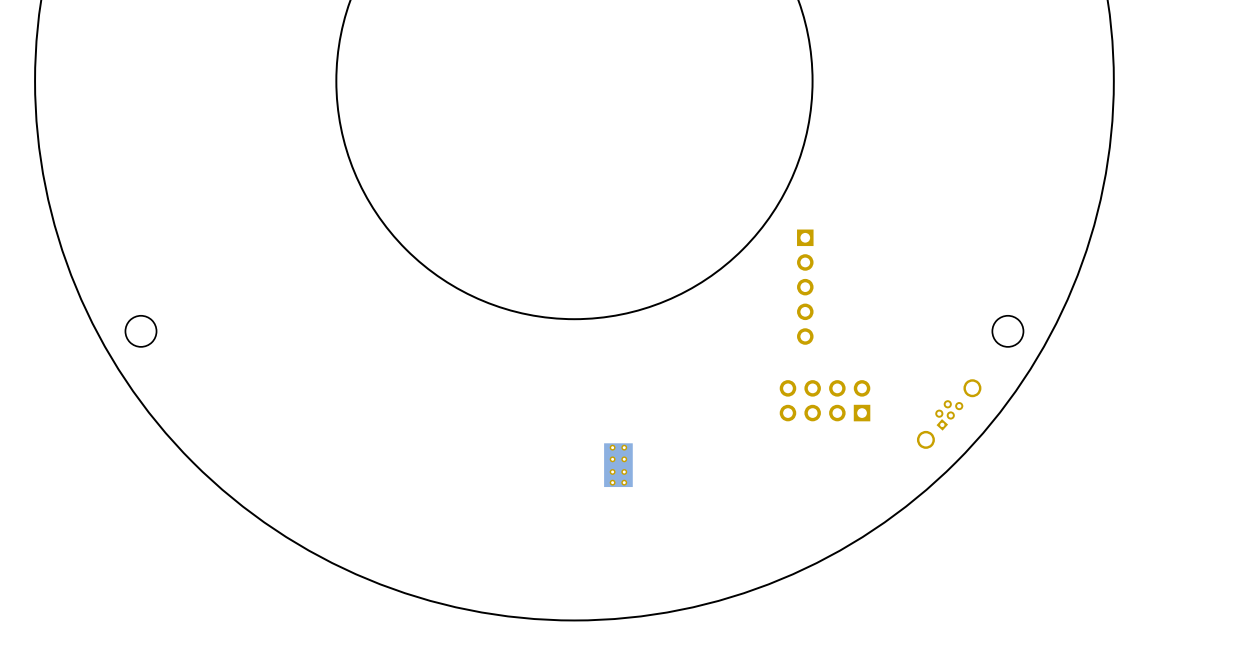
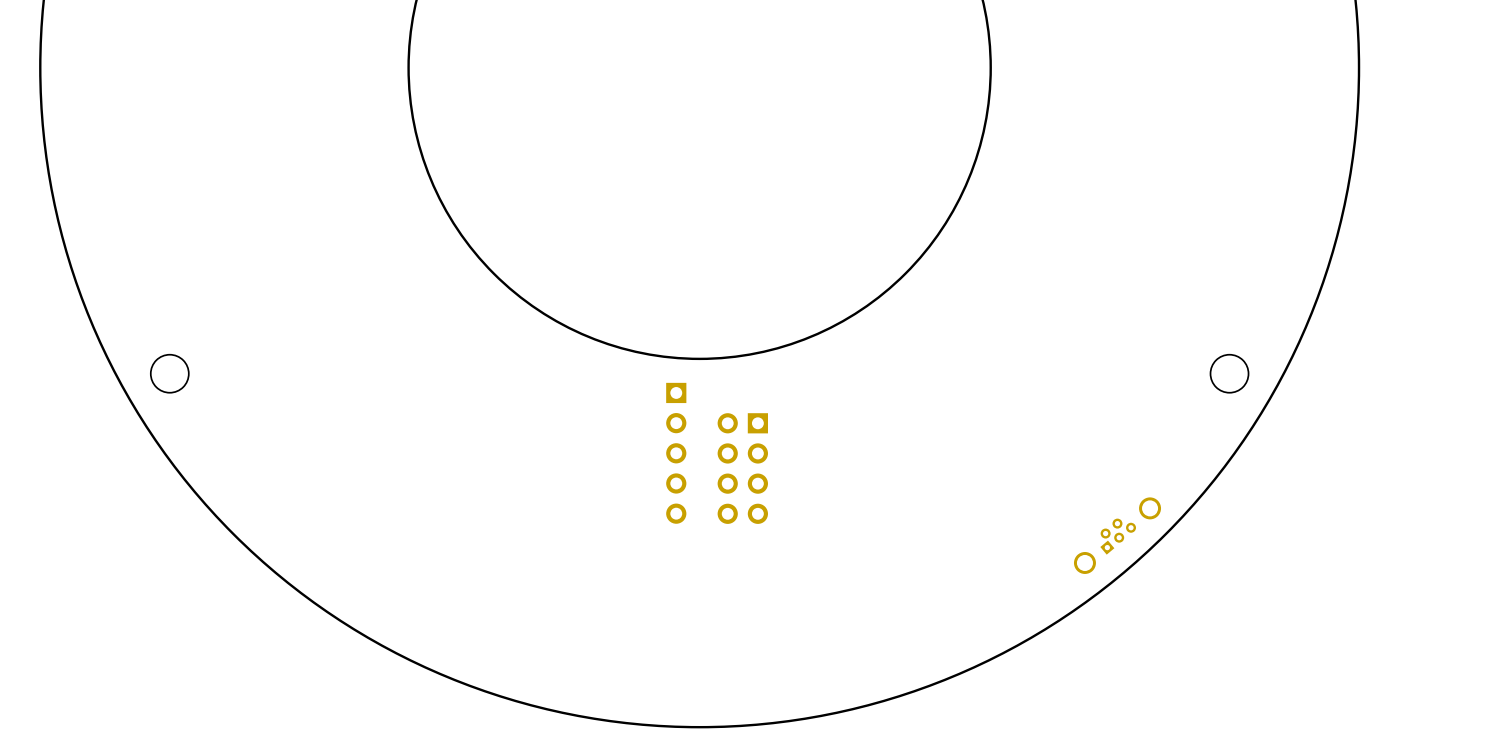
part: (805, 287) -> none
part: none -> (676, 453)
part rotation: 0° (825, 400) -> 90° counterclockwise (742, 468)
part position: (825, 400) -> (742, 468)
part: (949, 414) -> none
part: none -> (1117, 535)
part: (618, 465) -> none

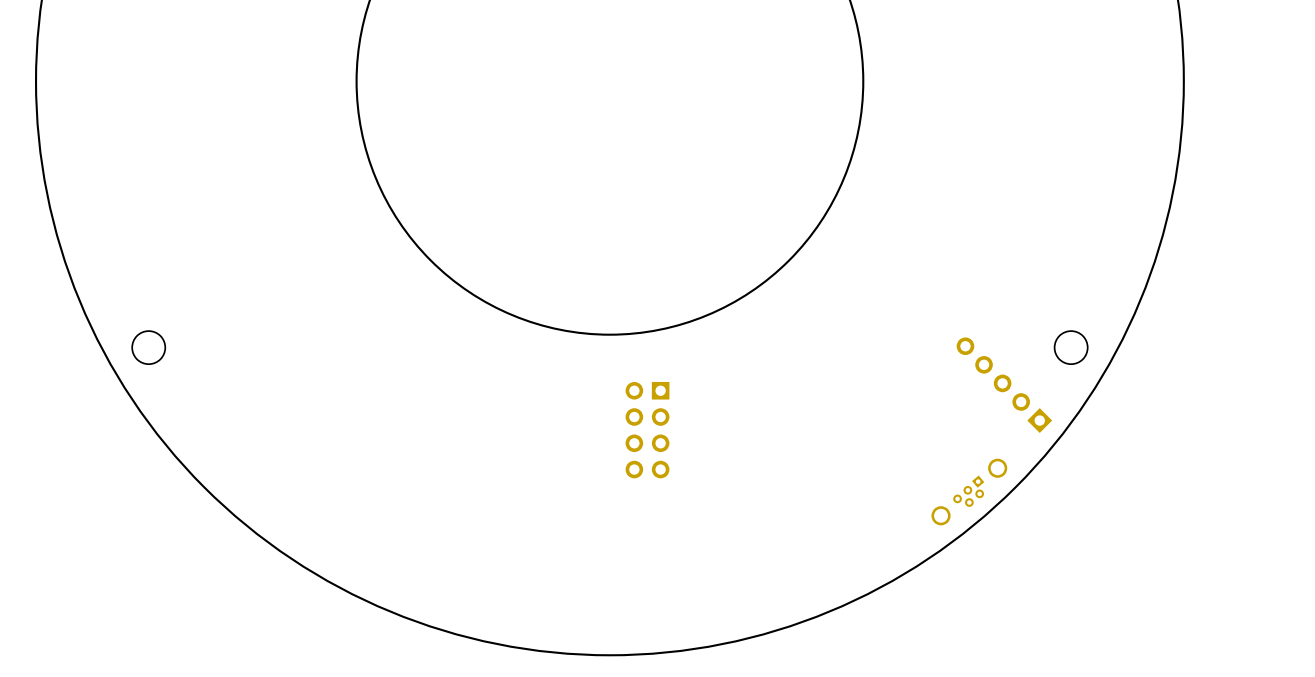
part: none -> (1004, 385)
part: (676, 453) -> none
part rotation: 0° (1117, 535) -> 180° (969, 492)

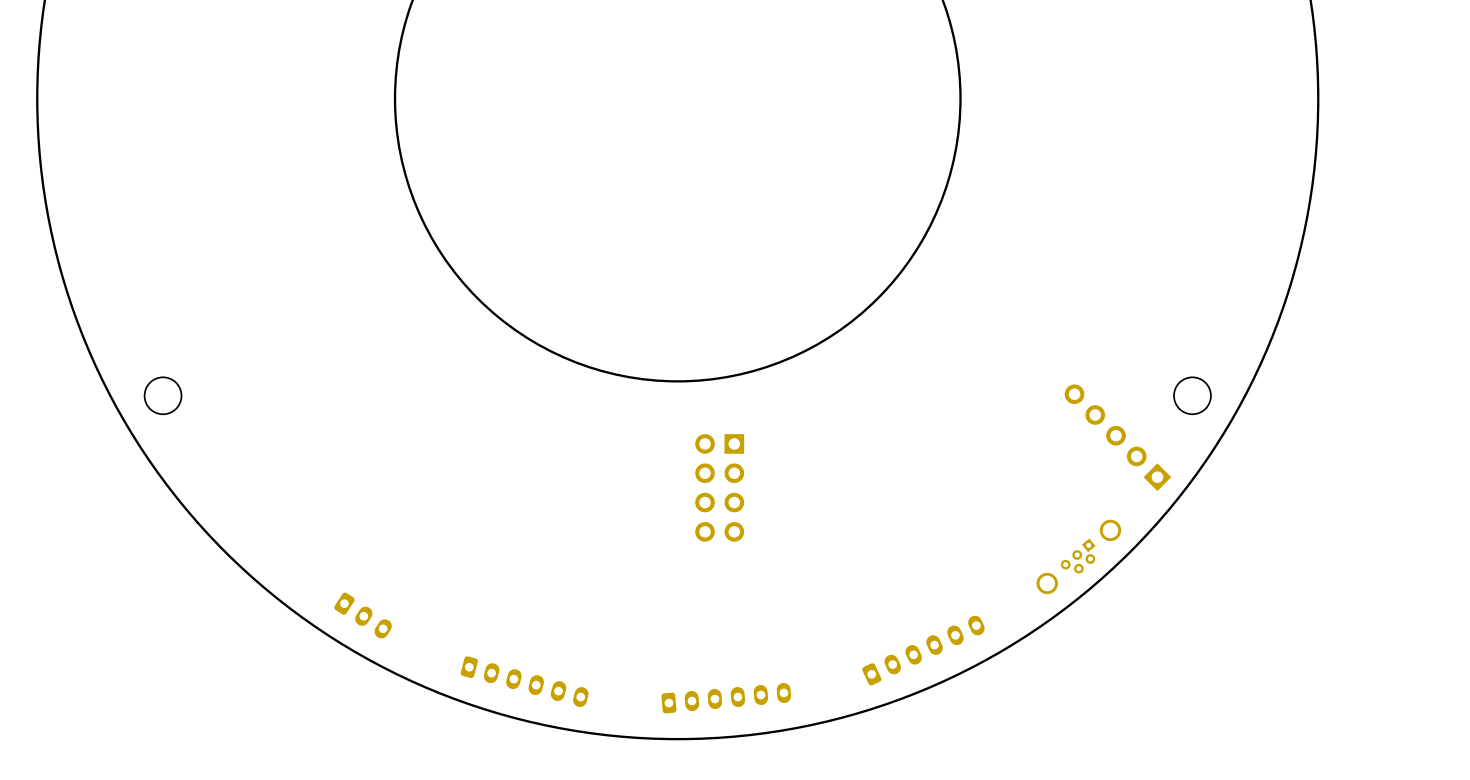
part: none -> (363, 615)
part: none -> (923, 650)
part: none -> (524, 681)
part: none -> (726, 698)

